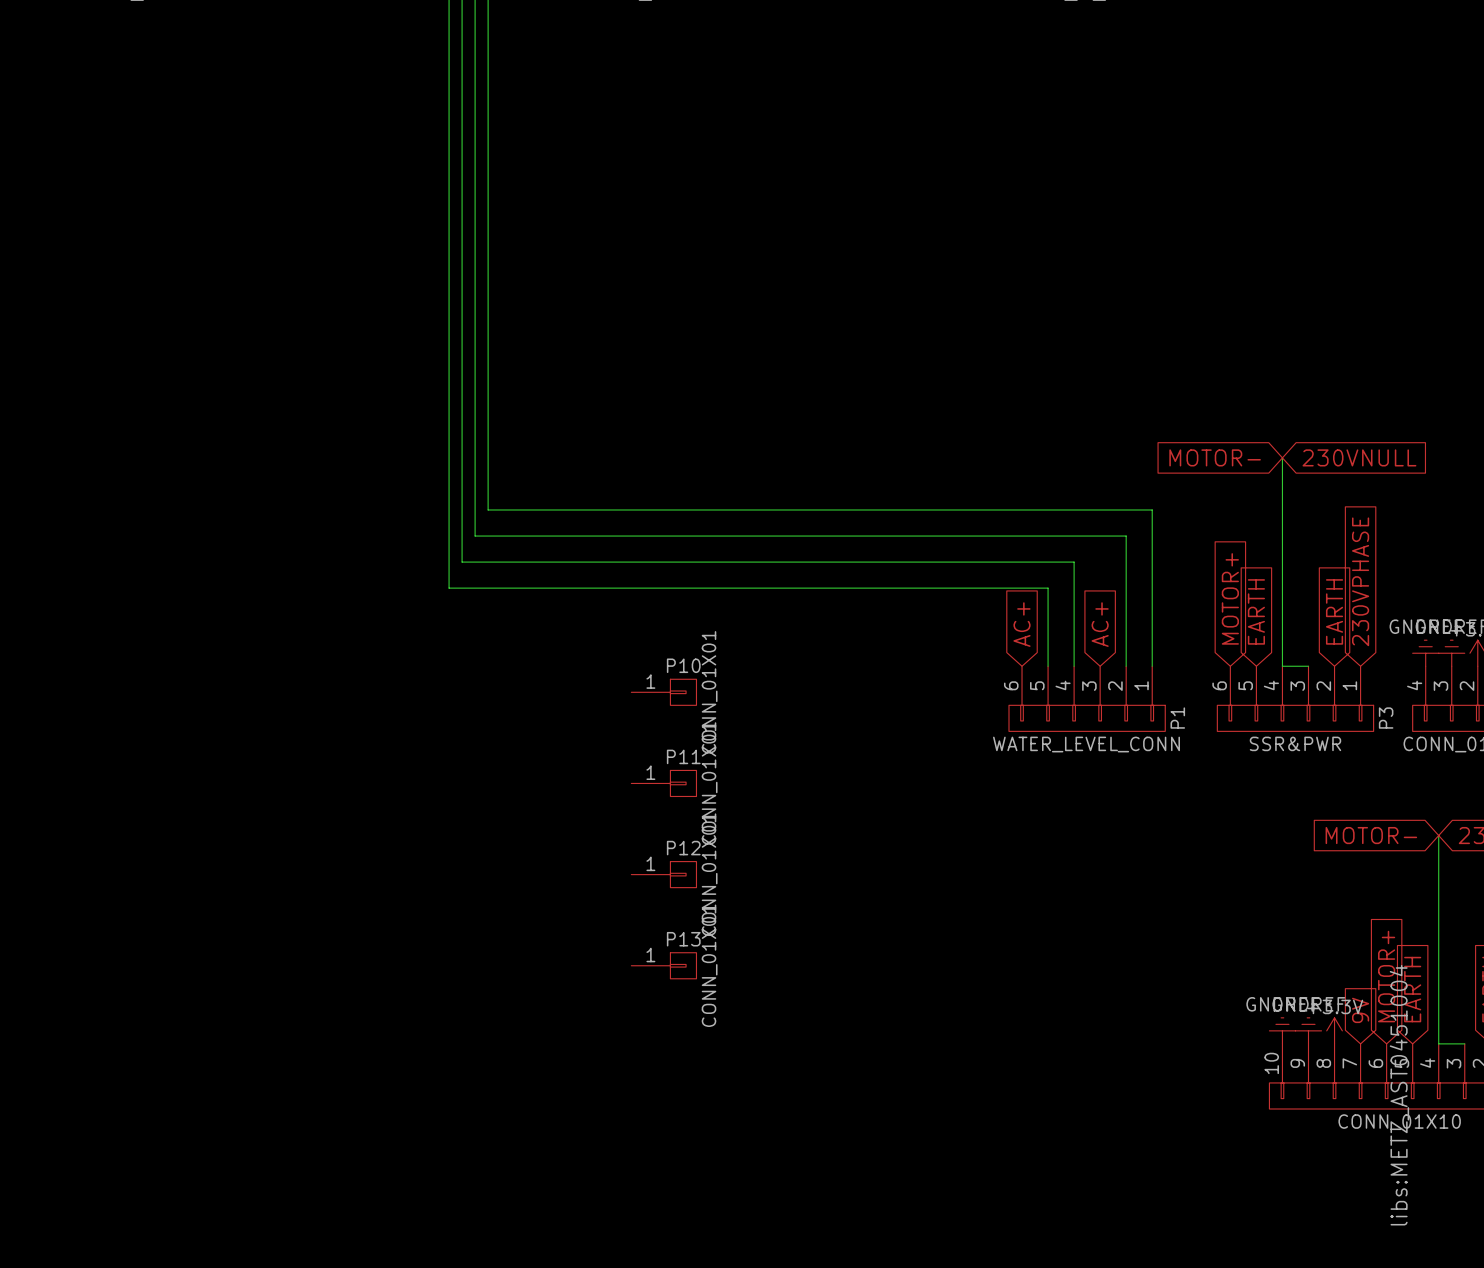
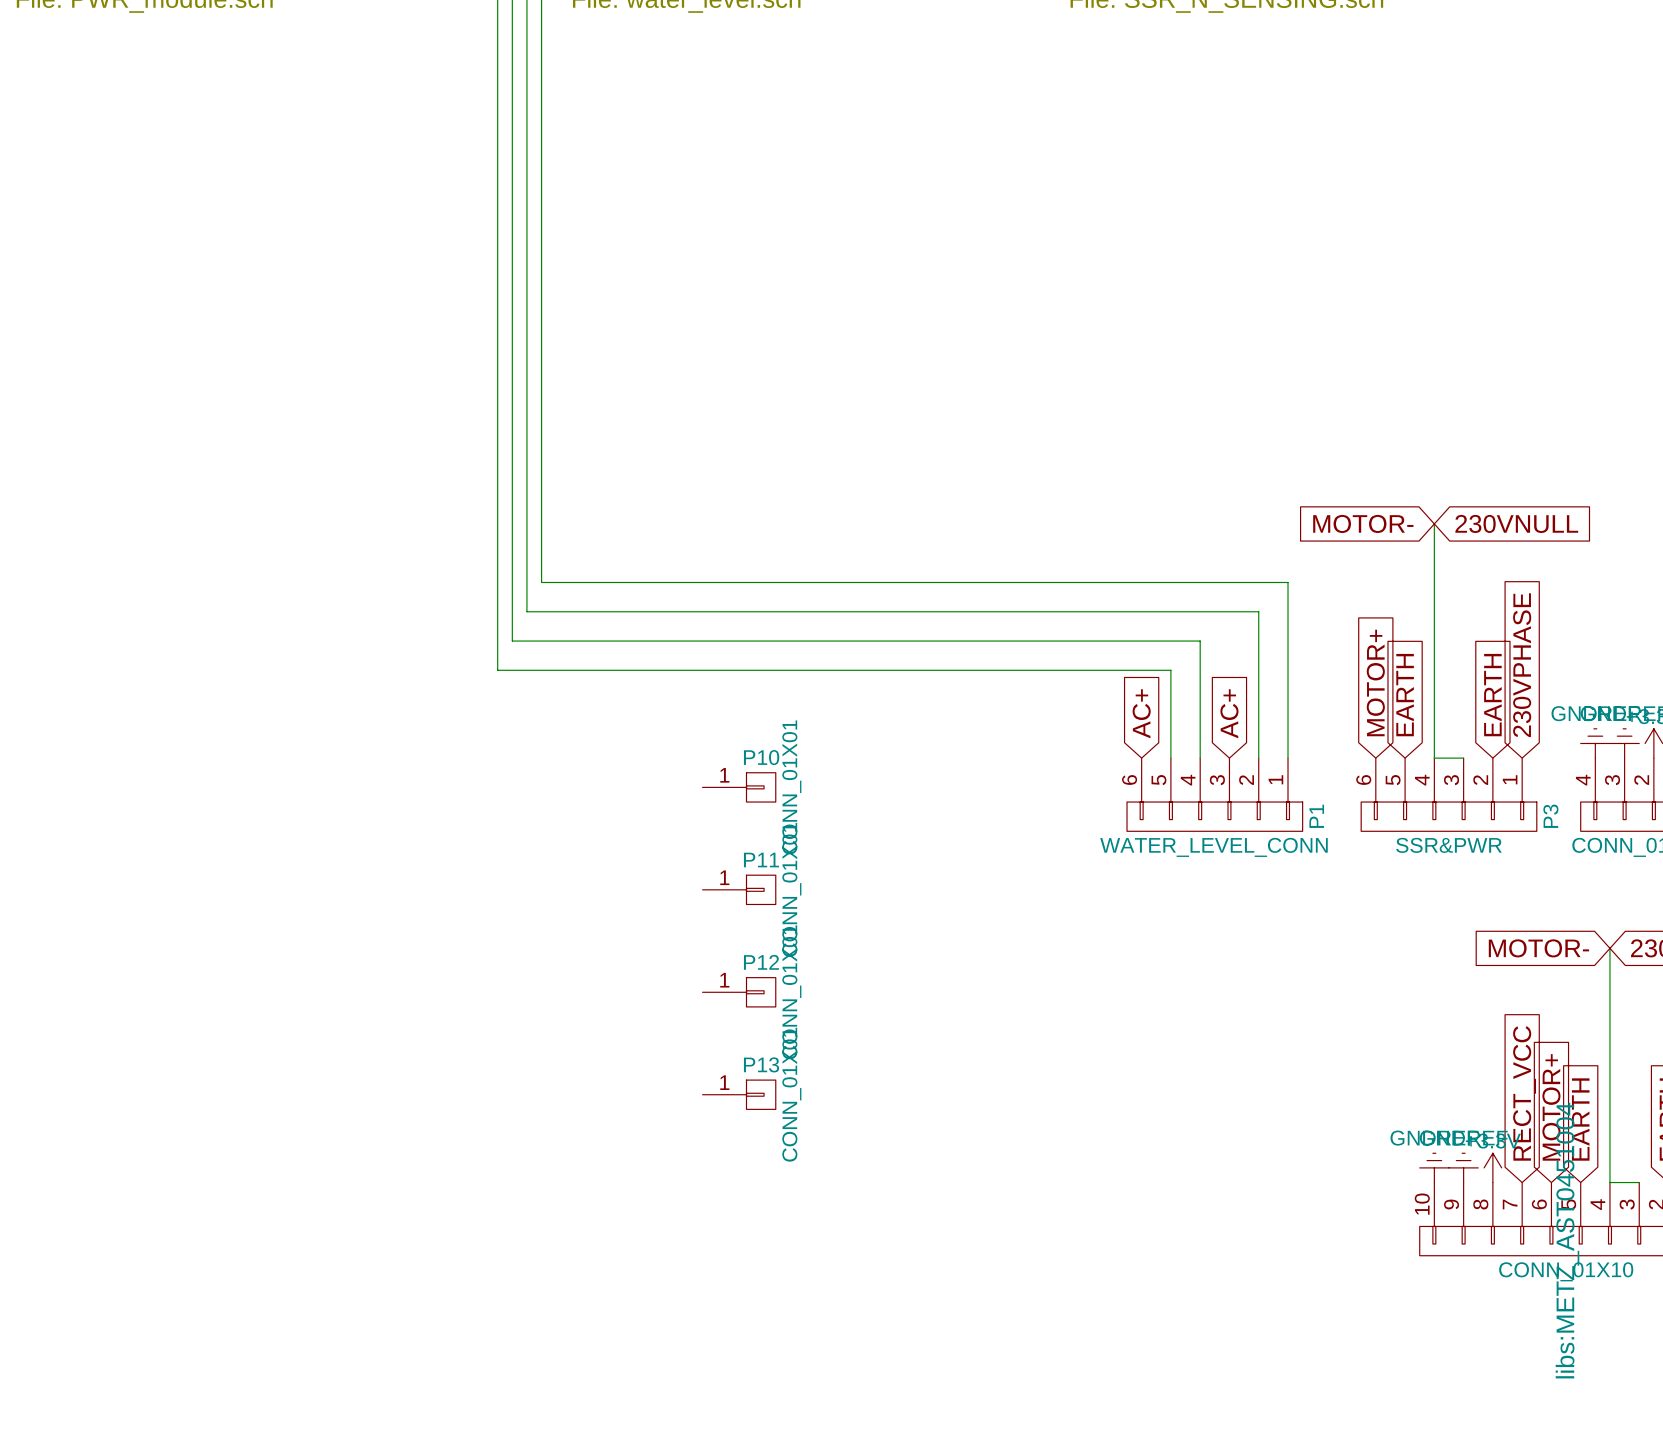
global label: 9V (1360, 1010) -> RECT_VCC (1524, 1093)

